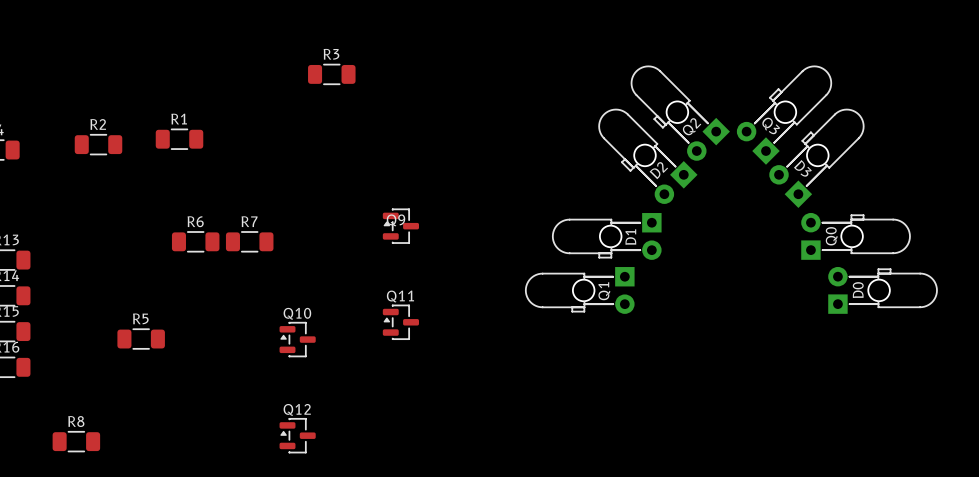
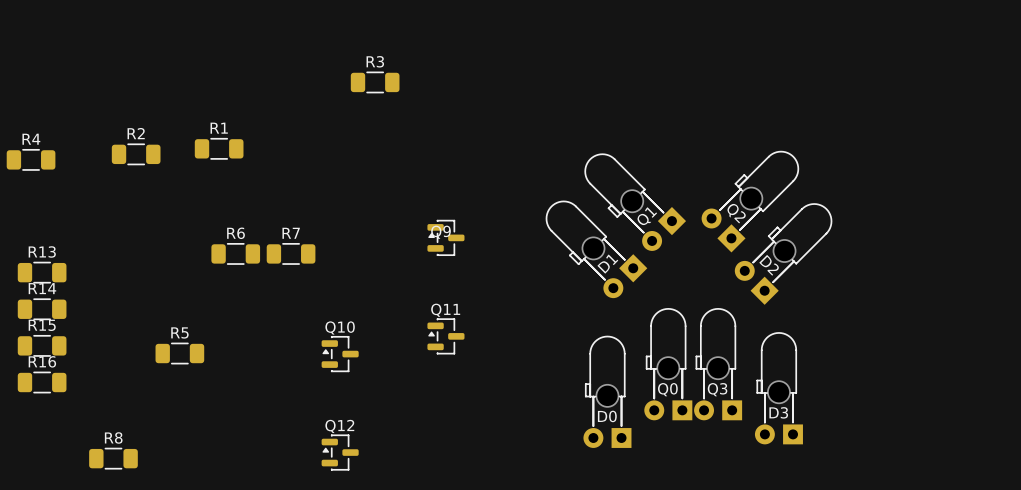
Q2 rotation: 0° (680, 113) -> 90° clockwise (750, 201)
Q2 position: (680, 113) -> (750, 201)
Q3 rotation: 0° (784, 115) -> 45° counterclockwise (718, 364)
Q3 position: (784, 115) -> (718, 364)
D2 rotation: 0° (648, 156) -> 90° clockwise (783, 254)
D2 position: (648, 156) -> (783, 254)
D3 rotation: 0° (816, 158) -> 45° counterclockwise (778, 388)
D3 position: (816, 158) -> (778, 388)
D1 rotation: 0° (606, 236) -> 45° clockwise (596, 249)
Q0 rotation: 0° (855, 236) -> 90° counterclockwise (668, 364)
Q0 position: (855, 236) -> (668, 364)
Q1 rotation: 0° (579, 290) -> 45° clockwise (635, 202)
Q1 position: (579, 290) -> (635, 202)
D0 rotation: 0° (882, 290) -> 90° counterclockwise (607, 391)
D0 position: (882, 290) -> (607, 391)

